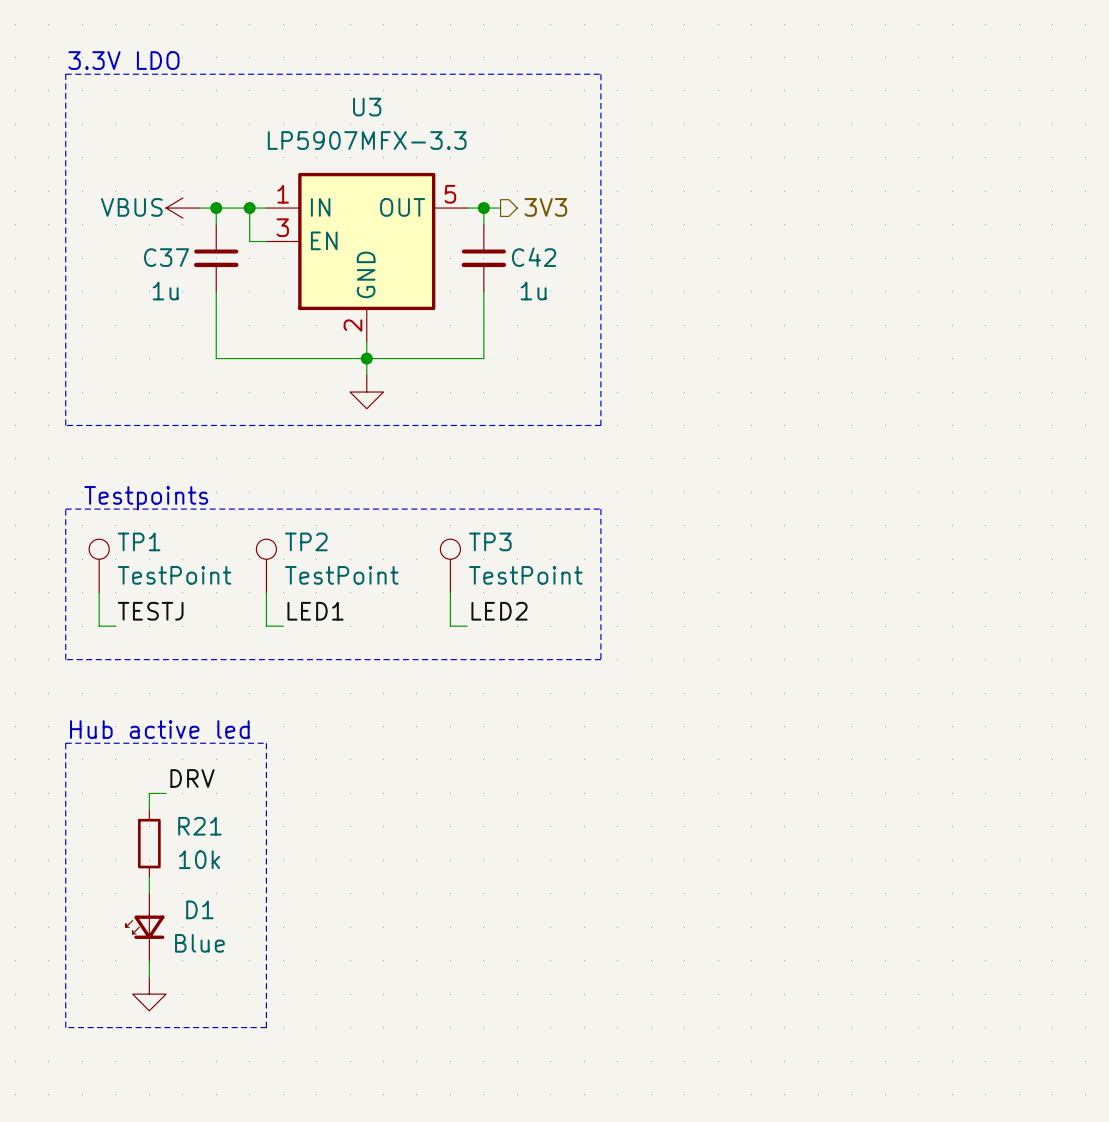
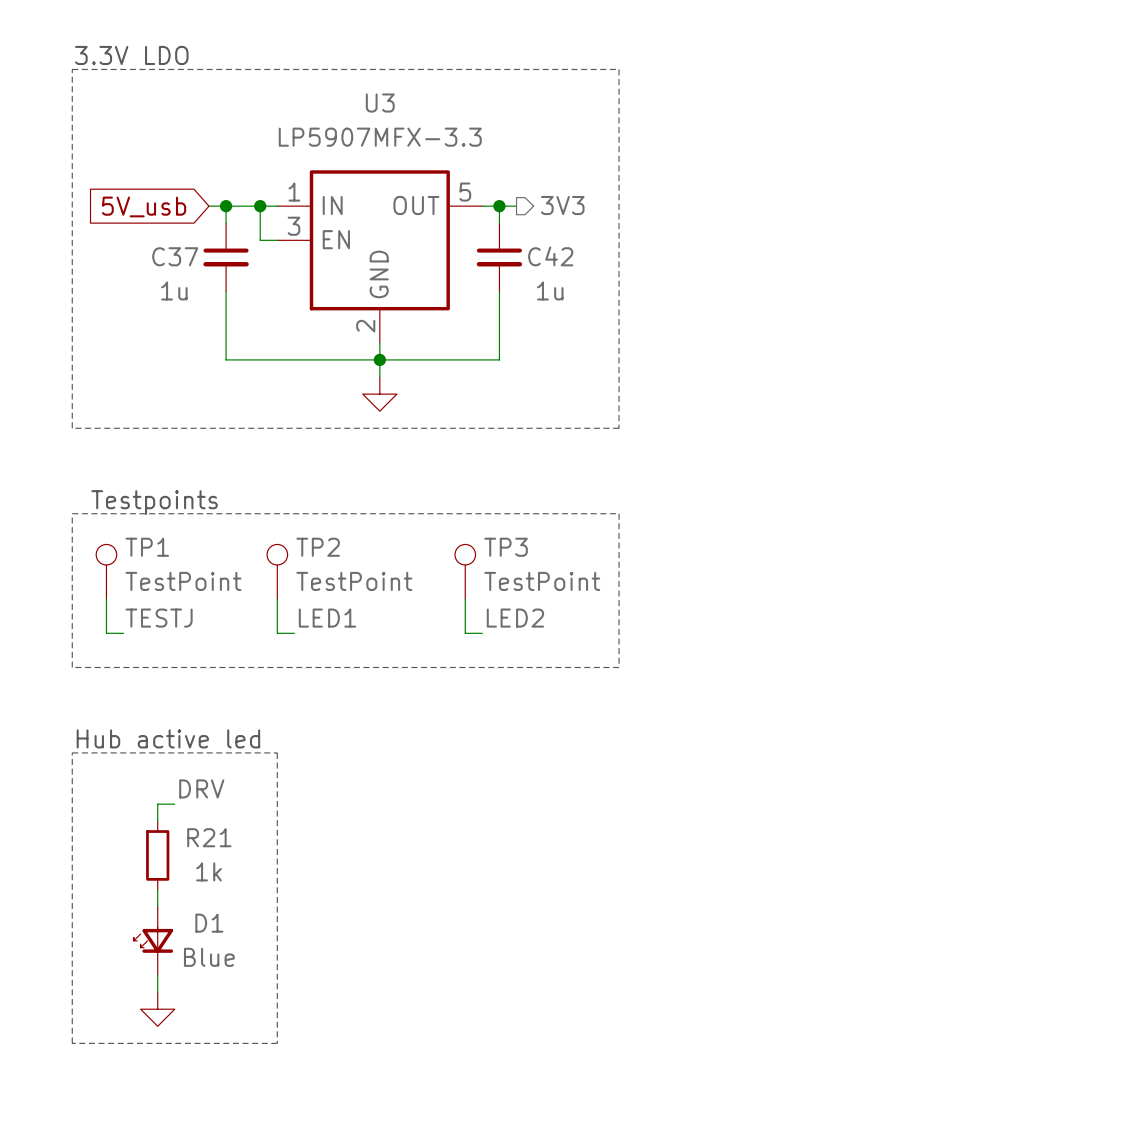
global label: none -> 5V_usb (144, 206)
power symbol: VBUS (182, 208) -> none
R21 value: 10k (199, 859) -> 1k (208, 871)

